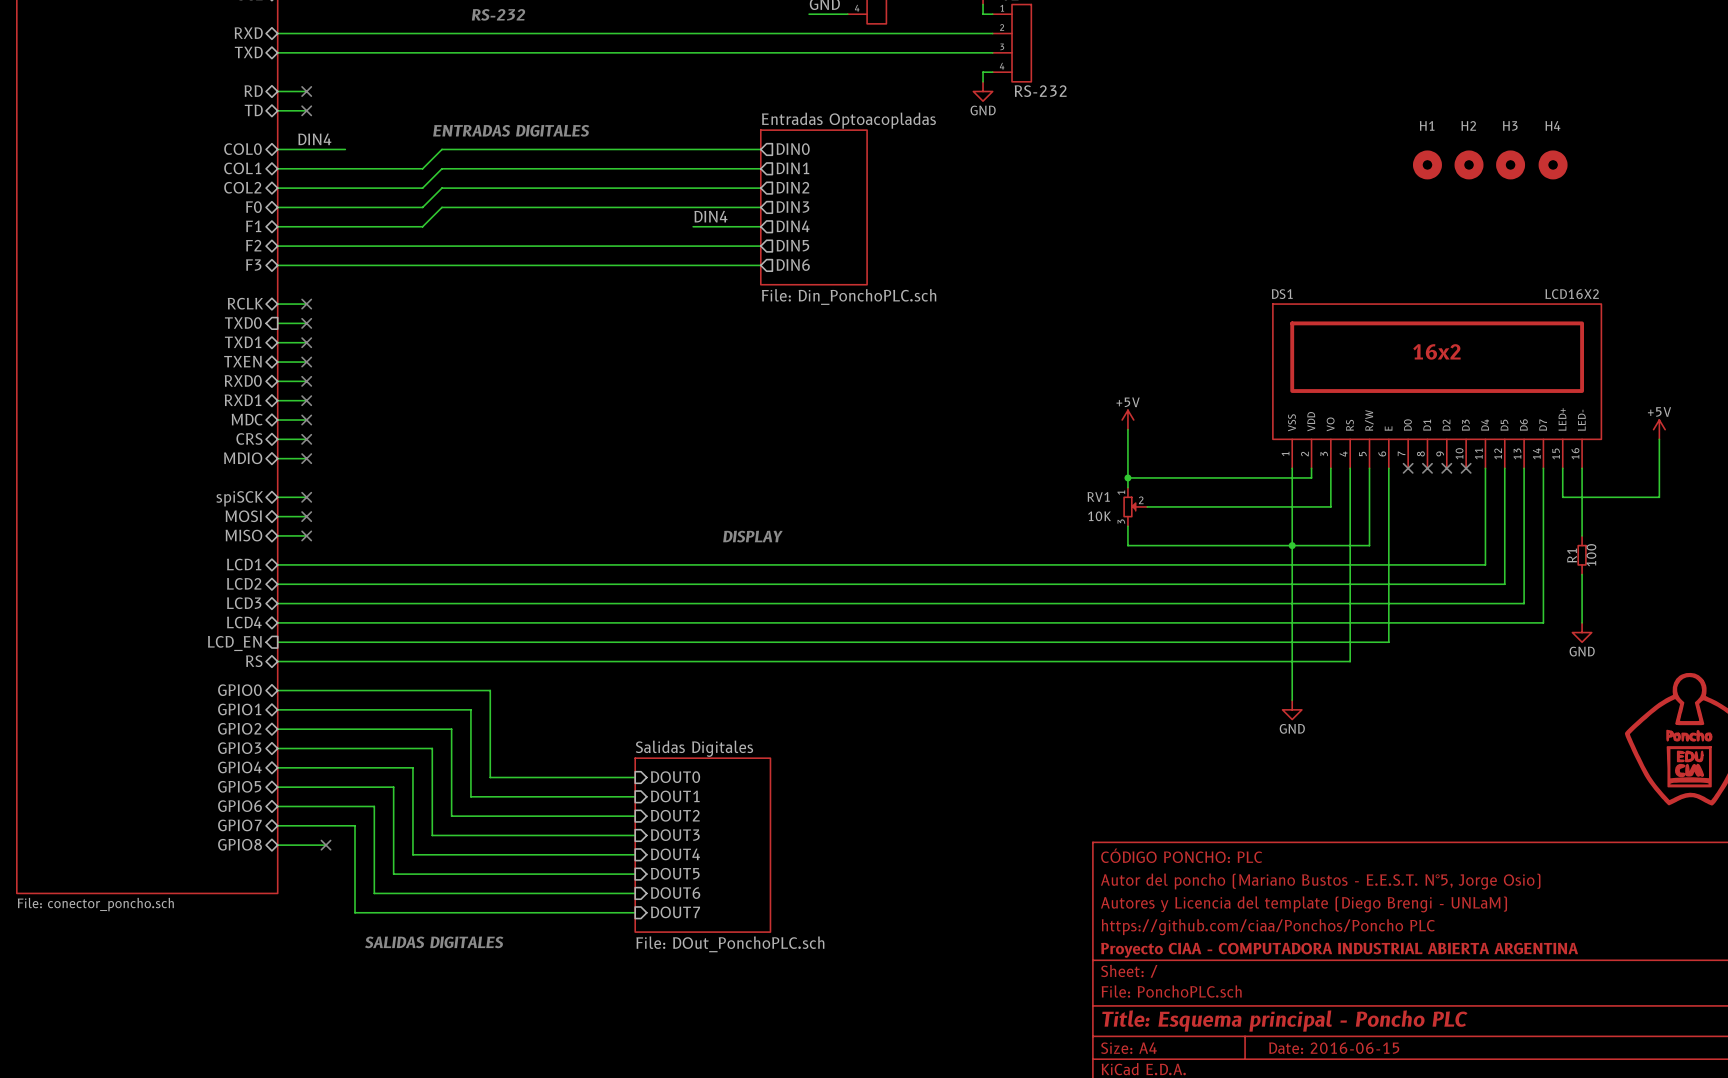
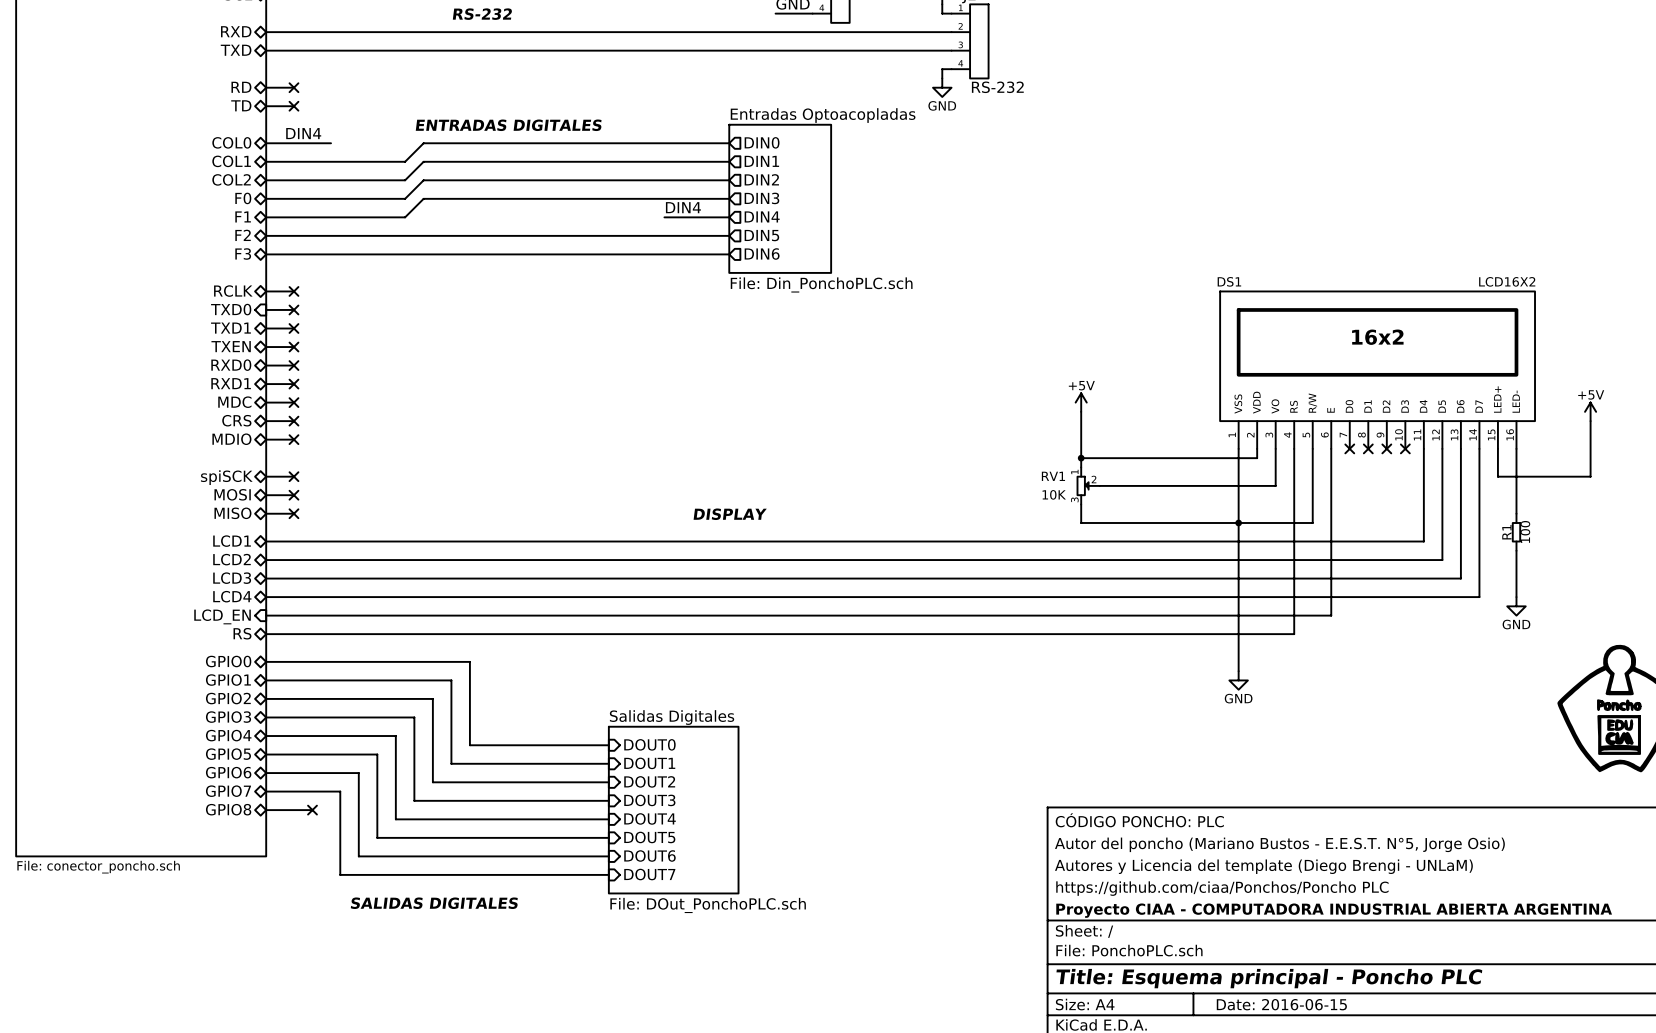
H1: (1427, 164) -> none
H2: (1469, 164) -> none
H3: (1510, 164) -> none
H4: (1553, 164) -> none

